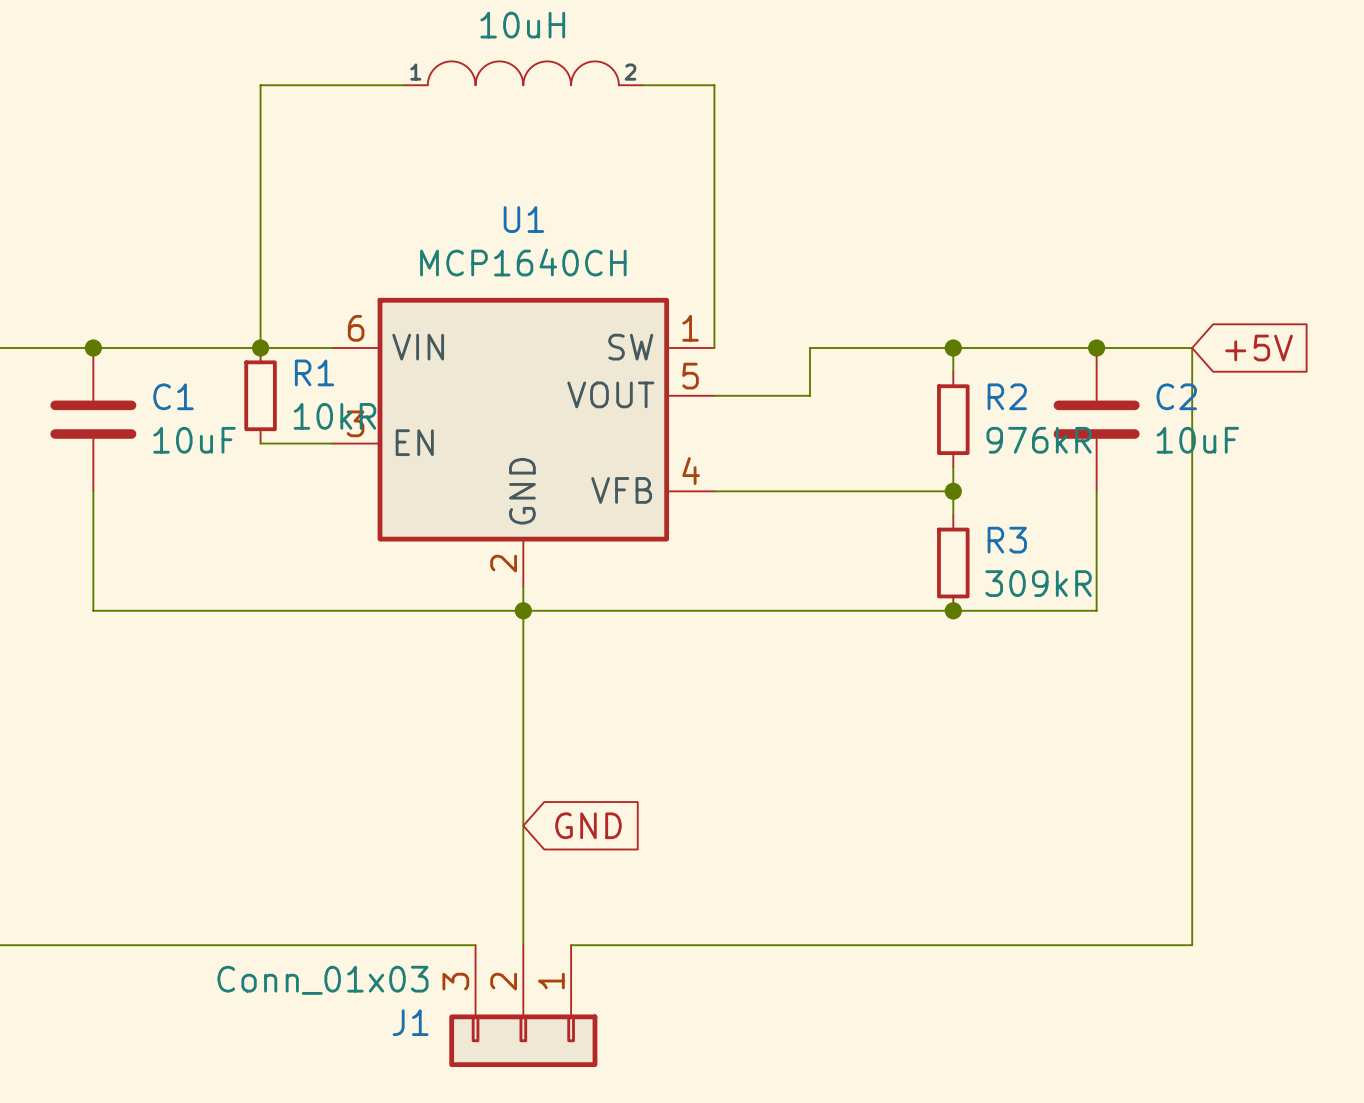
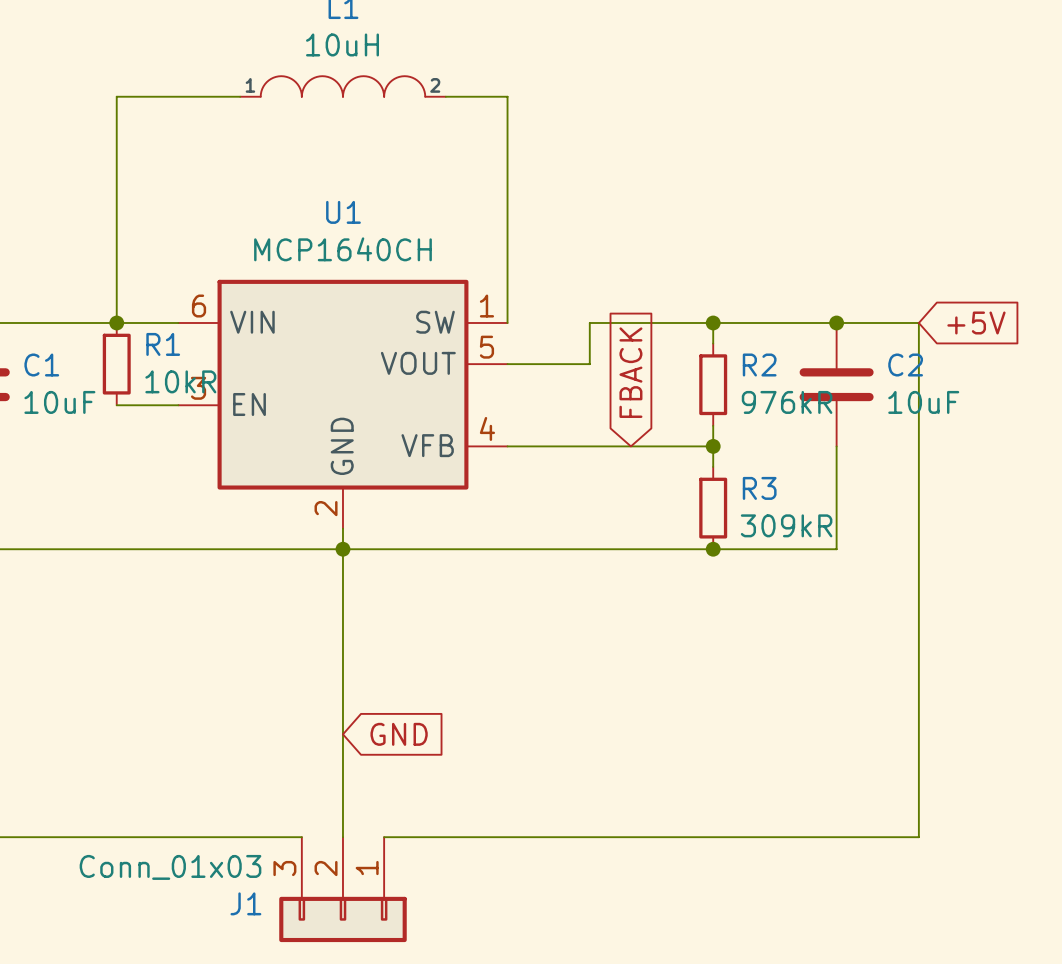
global label: none -> FBACK (630, 372)

